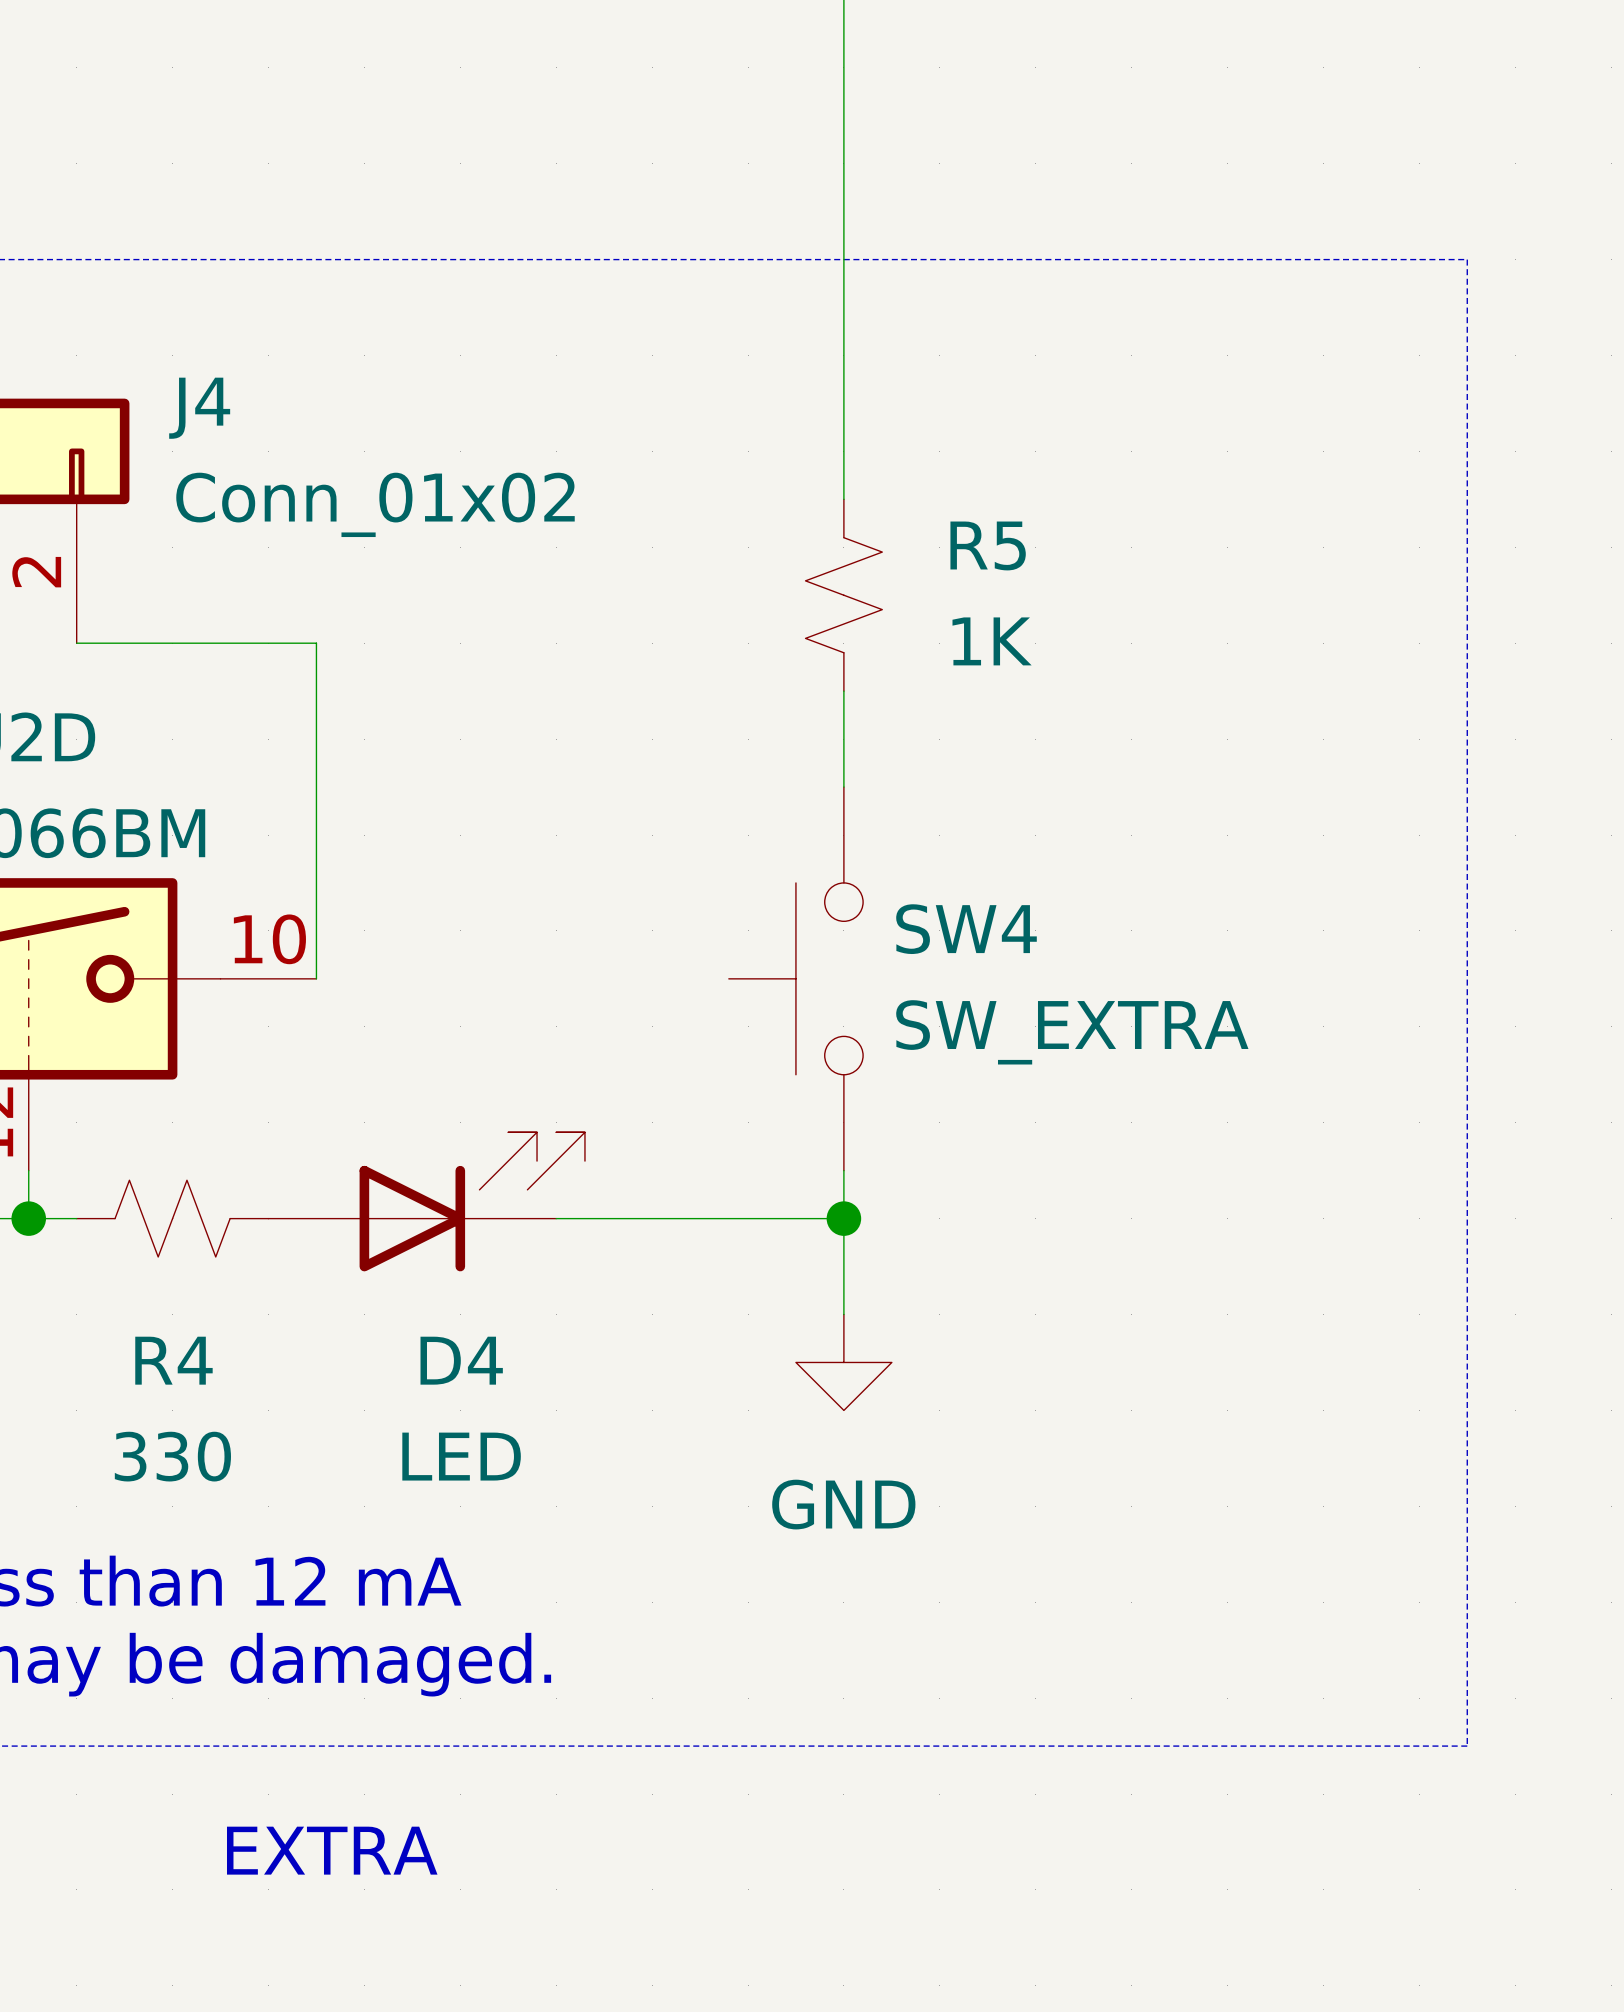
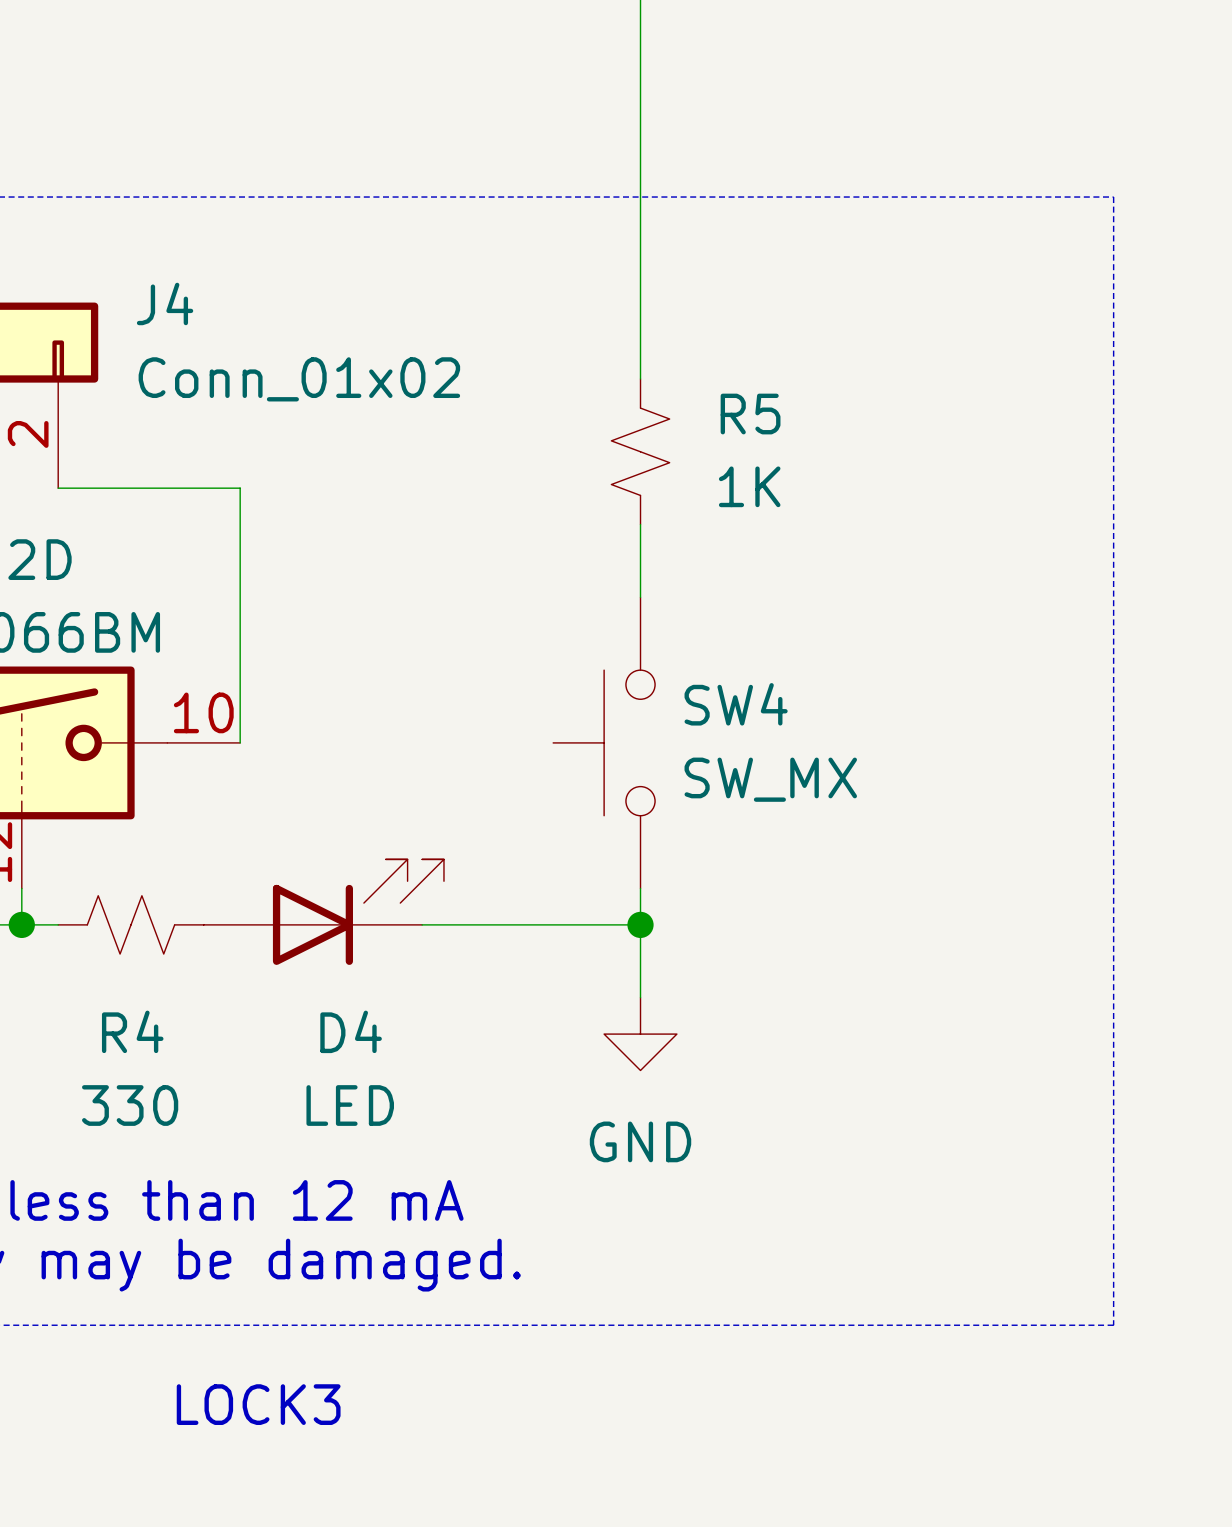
SW4 value: SW_EXTRA (1072, 1032) -> SW_MX (770, 779)
text: EXTRA (332, 1850) -> LOCK3 (258, 1404)

